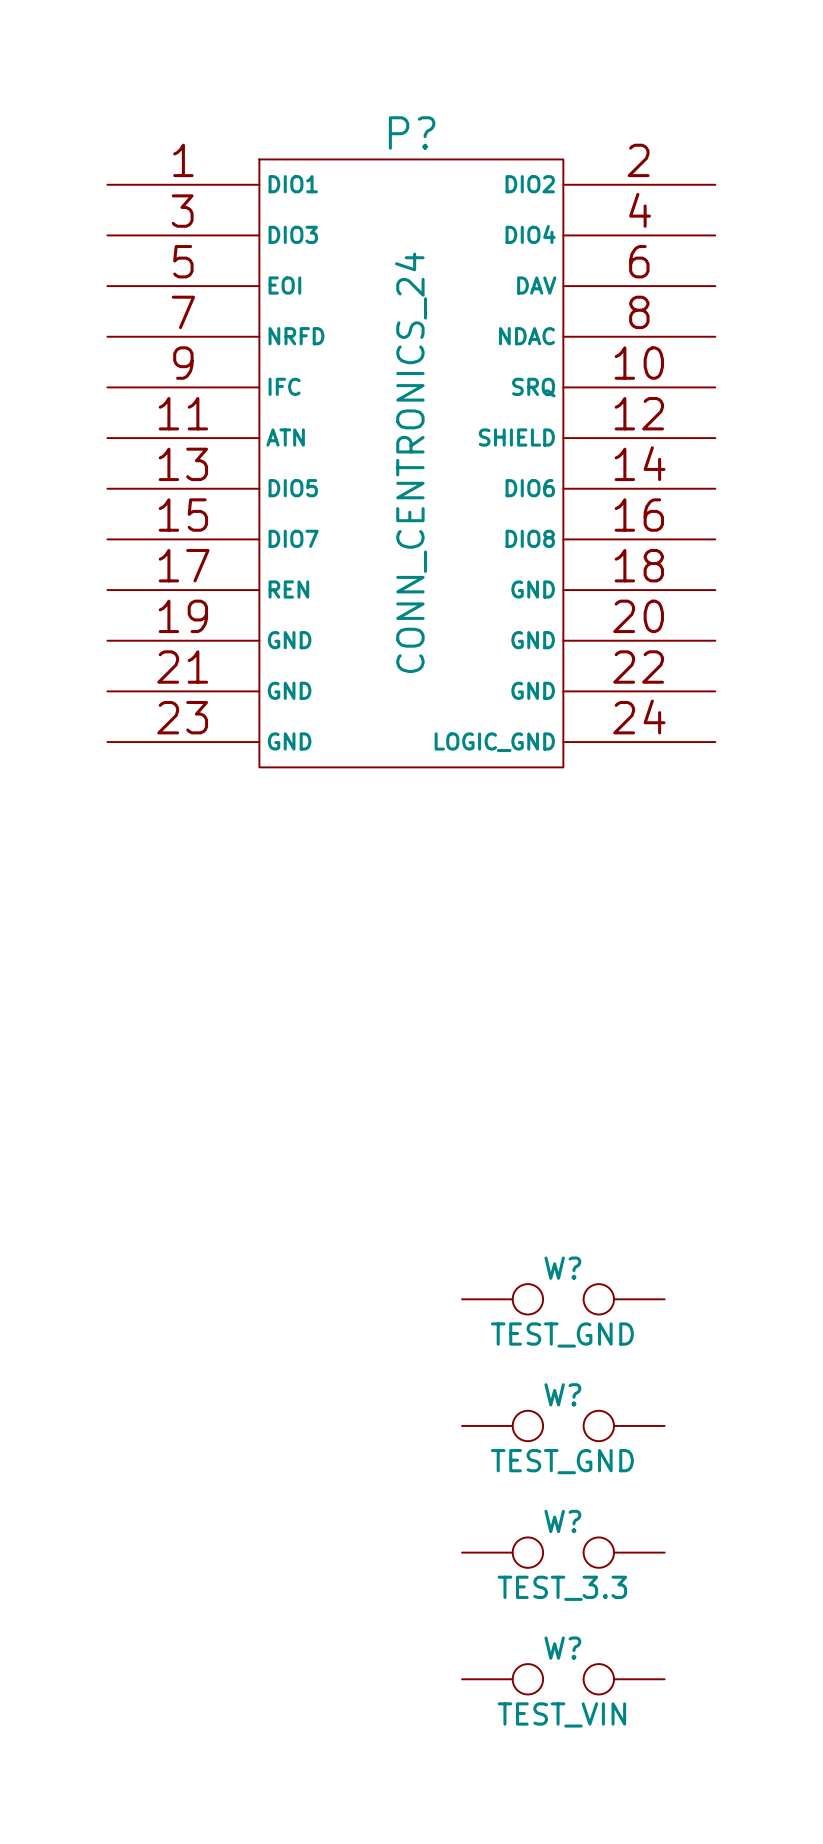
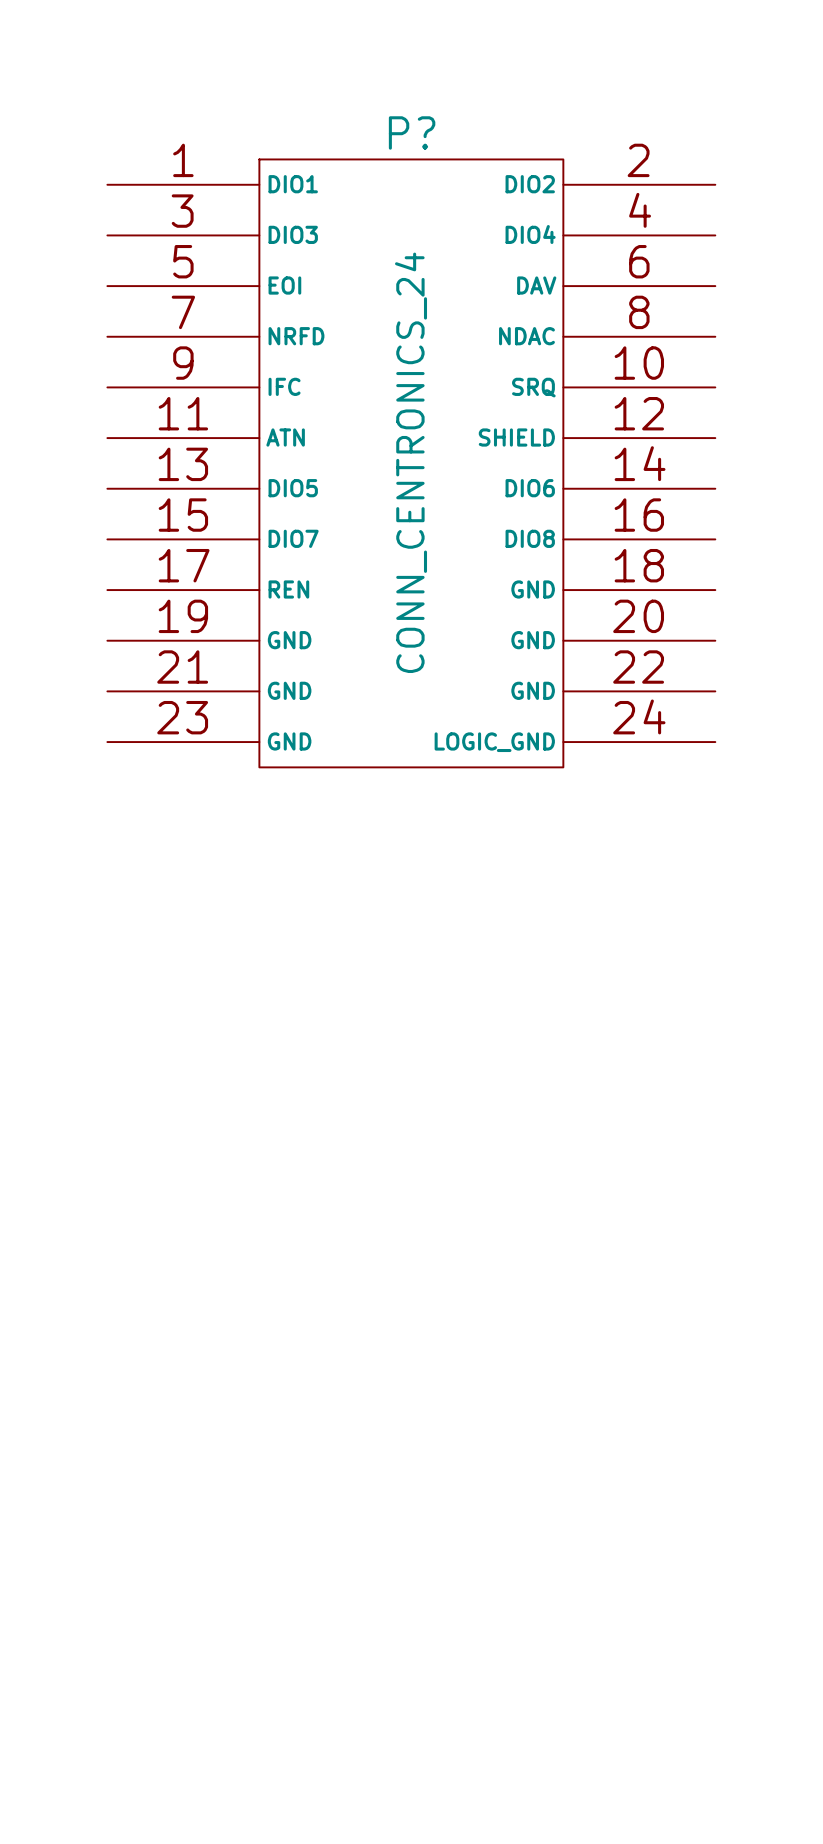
W?: TEST_GND (563, 1299) -> none
W?: TEST_GND (563, 1425) -> none
W?: TEST_3.3 (563, 1552) -> none
W?: TEST_VIN (563, 1679) -> none

